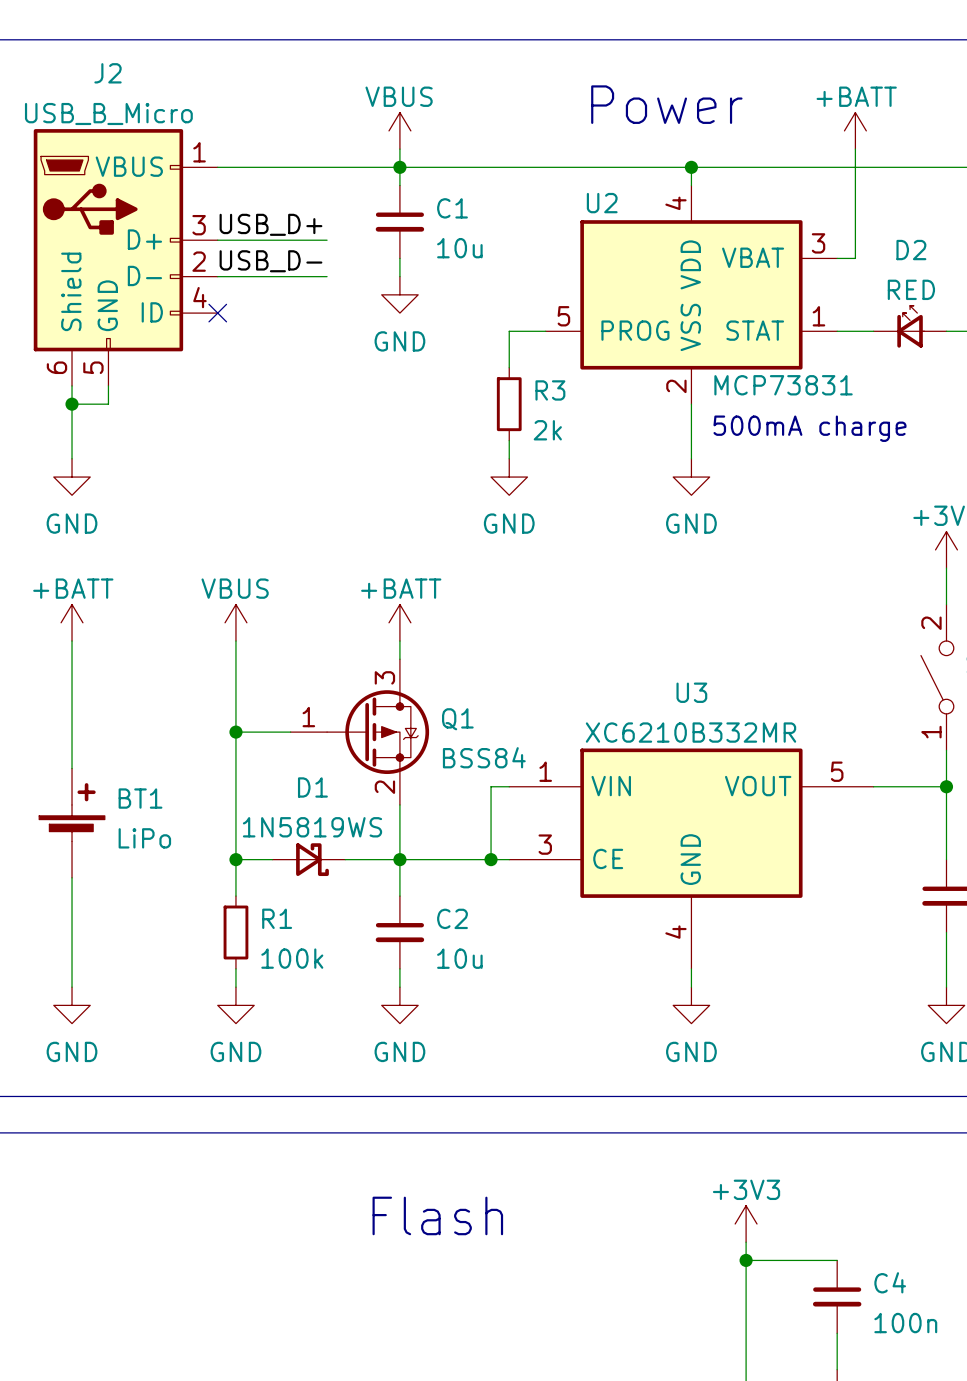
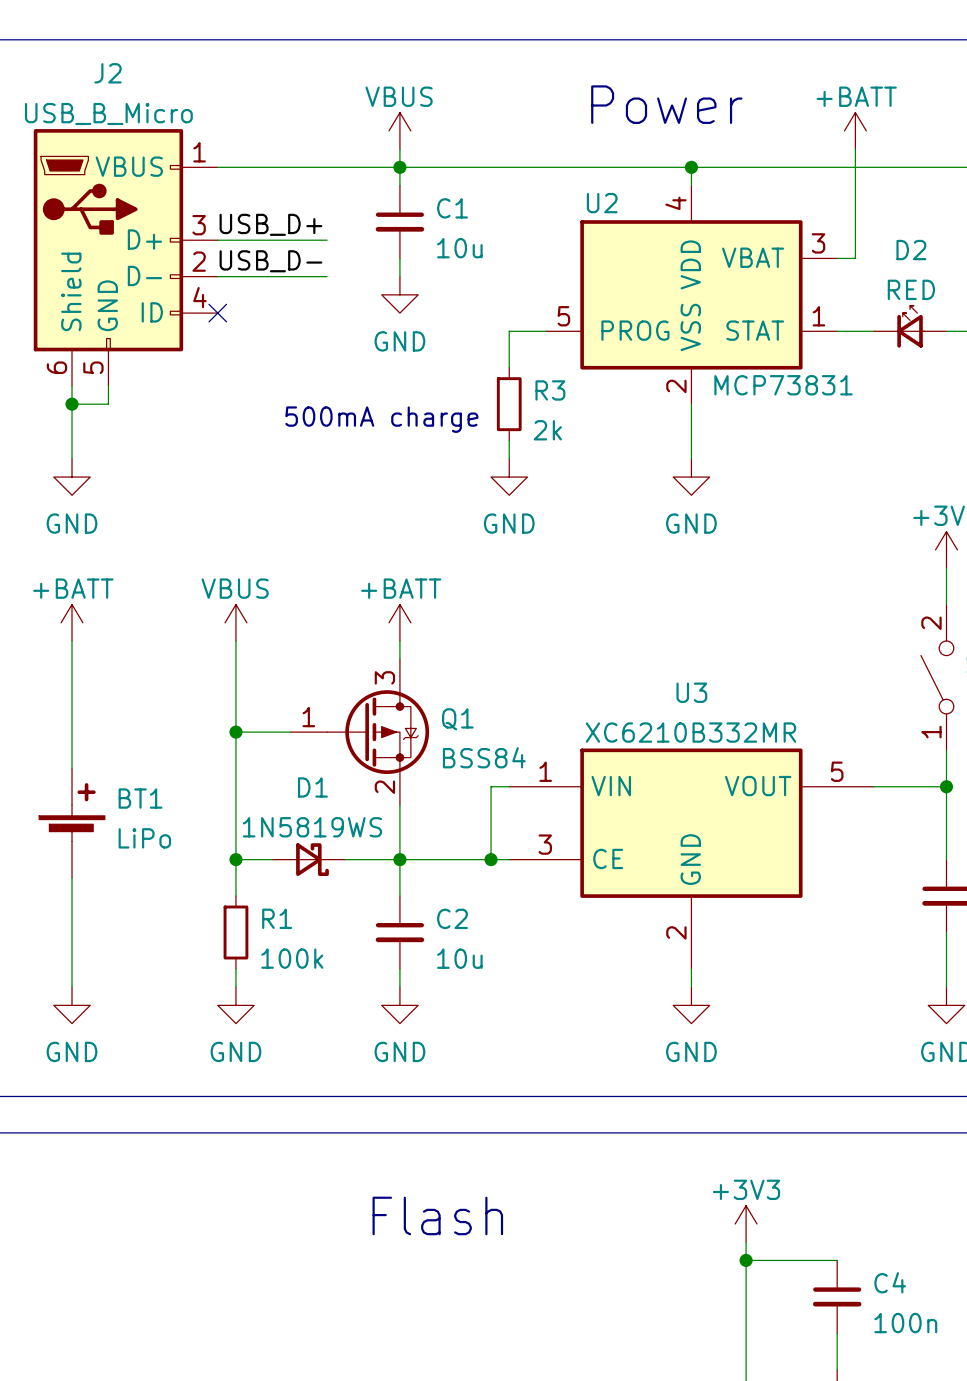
text: none -> 500mA charge (381, 419)
text: 500mA charge (809, 428) -> none
U3 pin number: 4 (675, 932) -> 2 (676, 932)

